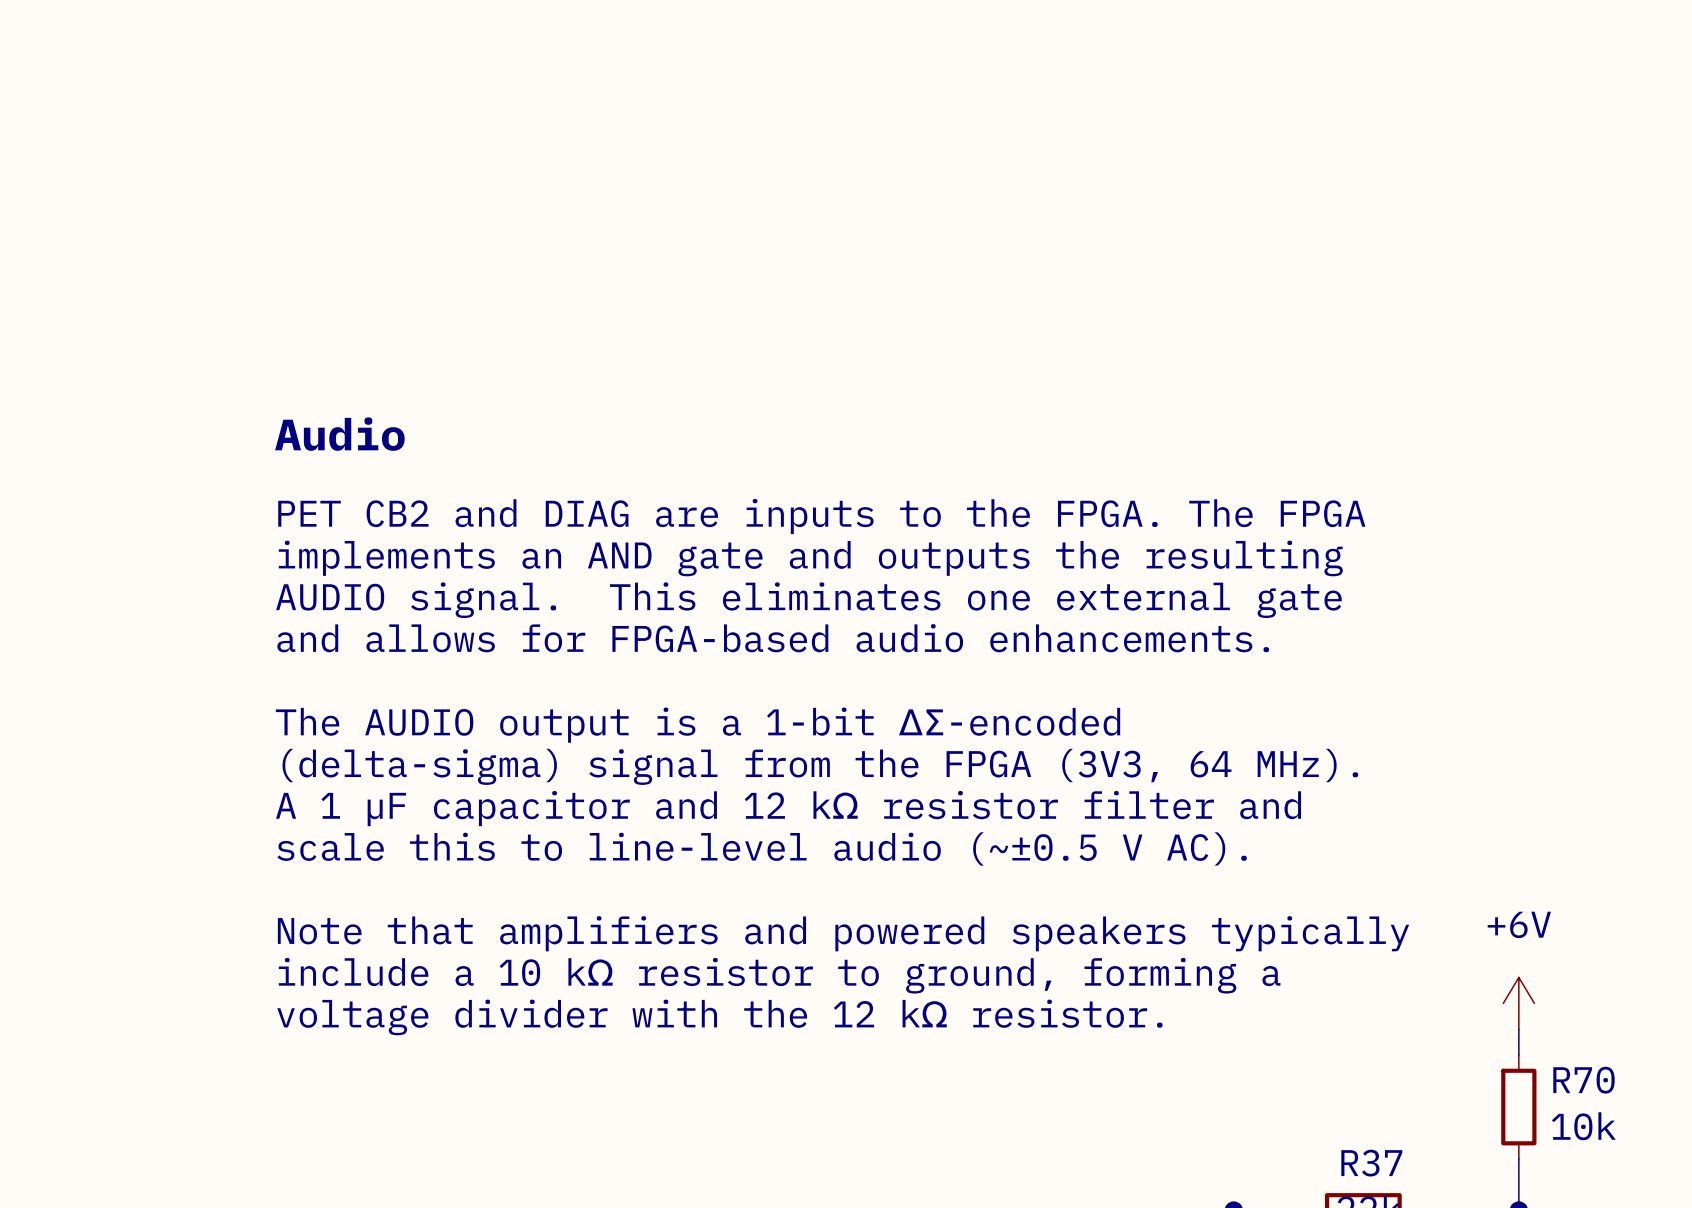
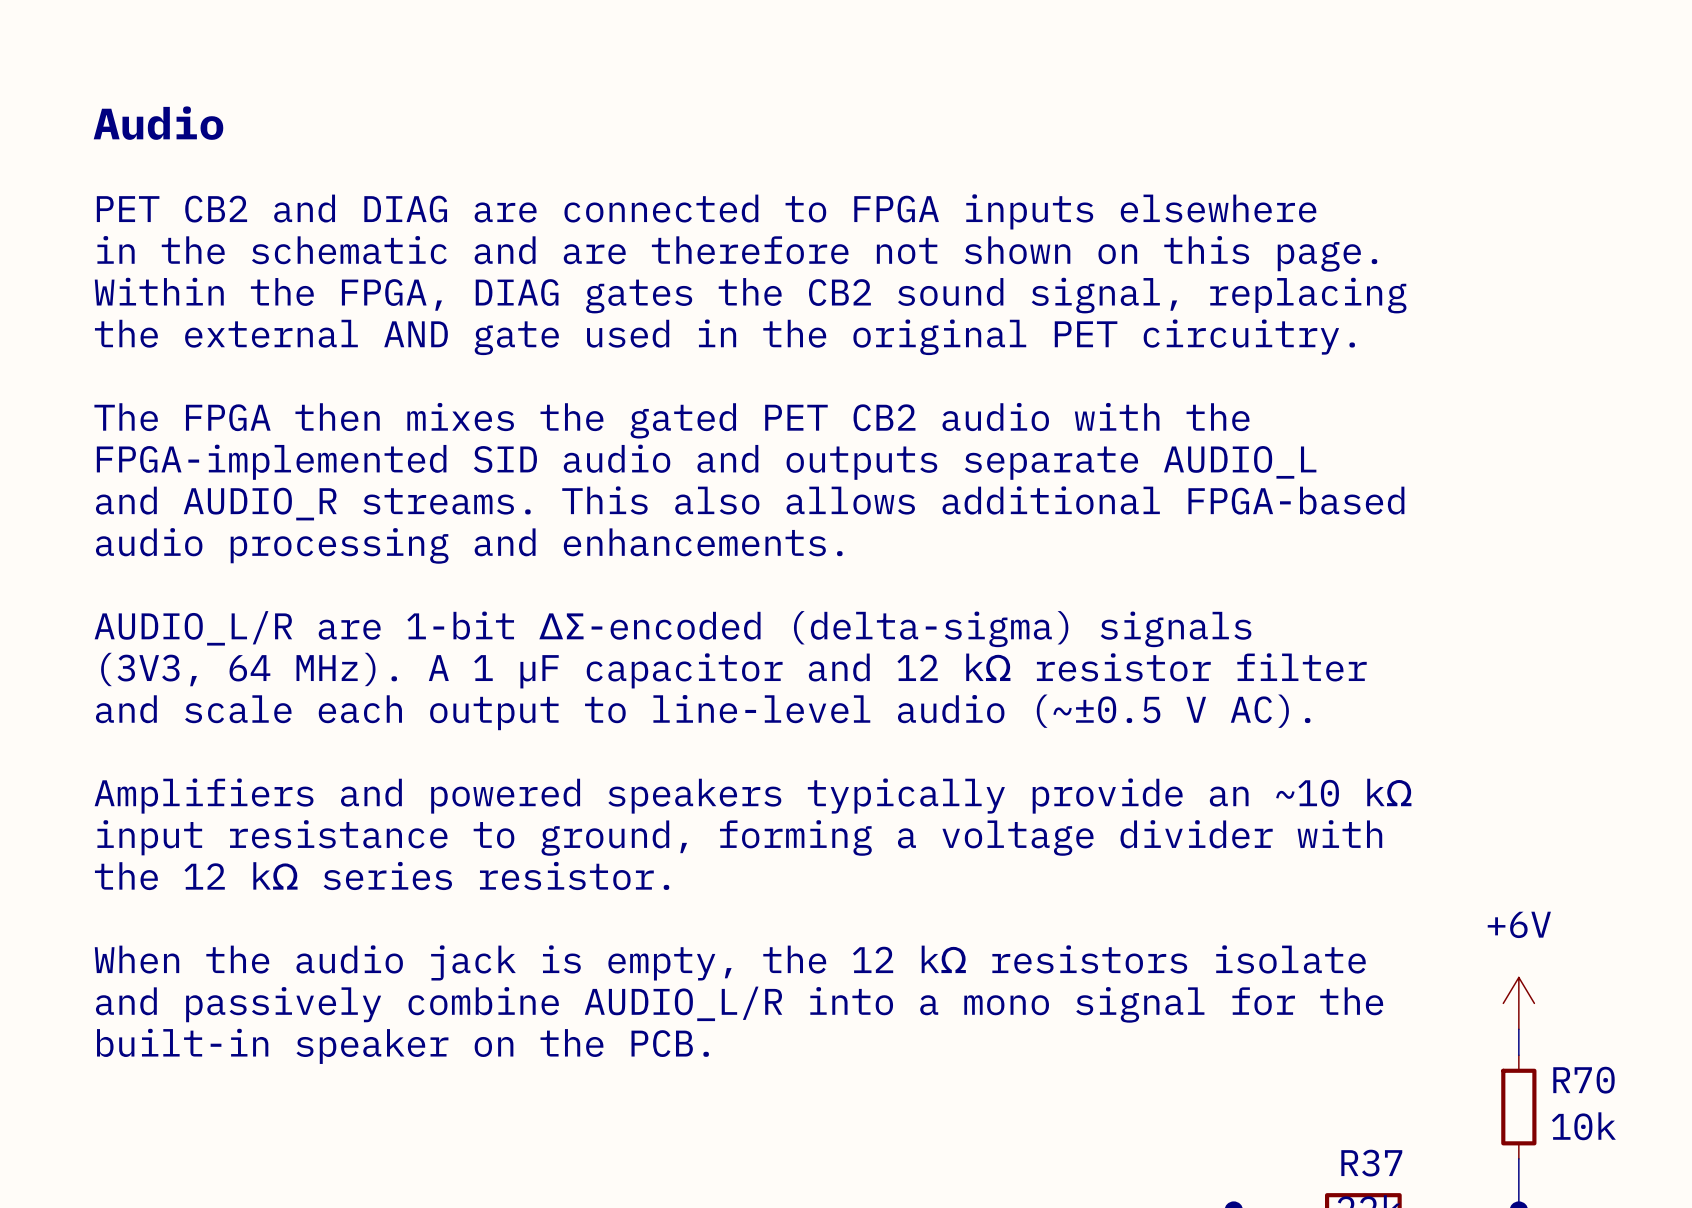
text: none -> PET CB2 and DIAG are connected to FPGA inputs elsewhere (706, 211)
text: none -> in the schematic and are therefore not shown on this page. (737, 253)
text: none -> Within the FPGA, DIAG gates the CB2 sound signal, replacing (750, 295)
text: none -> the external AND gate used in the original PET circuitry. (724, 337)
text: none -> The FPGA then mixes the gated PET CB2 audio with the (671, 420)
text position: Audio (339, 434) -> Audio (158, 123)
text: none -> FPGA-implemented SID audio and outputs separate AUDIO_L (706, 462)
text: none -> and AUDIO_R streams. This also allows additional FPGA-based (750, 503)
text: PET CB2 and DIAG are inputs to the FPGA. The FPGA (821, 516) -> none
text: none -> audio processing and enhancements. (469, 545)
text: implements an AND gate and outputs the resulting (810, 558) -> none
text: AUDIO signal. This eliminates one external gate (808, 600) -> none
text: none -> AUDIO_L/R are 1-bit ΔΣ-encoded (delta-sigma) signals (672, 629)
text: and allows for FPGA-based audio enhancements. (773, 638) -> none
text: none -> (3V3, 64 MHz). A 1 µF capacitor and 12 kΩ resistor filter (733, 670)
text: none -> and scale each output to line-level audio (~±0.5 V AC). (703, 712)
text: The AUDIO output is a 1-bit ΔΣ-encoded (697, 725) -> none
text: (delta-sigma) signal from the FPGA (3V3, 64 MHz). (820, 766) -> none
text: none -> Amplifiers and powered speakers typically provide an ~10 kΩ (753, 796)
text: A 1 µF capacitor and 12 kΩ resistor filter and (788, 808) -> none
text: none -> input resistance to ground, forming a voltage divider with (739, 837)
text: scale this to line-level audio (~±0.5 V AC). (762, 848) -> none
text: none -> the 12 kΩ series resistor. (382, 875)
text: Note that amplifiers and powered speakers typically (843, 933) -> none
text: none -> When the audio jack is empty, the 12 kΩ resistors isolate (730, 962)
text: include a 10 kΩ resistor to ground, forming a (779, 975) -> none
text: none -> and passively combine AUDIO_L/R into a mono signal for the (739, 1004)
text: voltage divider with the 12 kΩ resistor. (719, 1017) -> none
text: none -> built-in speaker on the PCB. (402, 1046)

